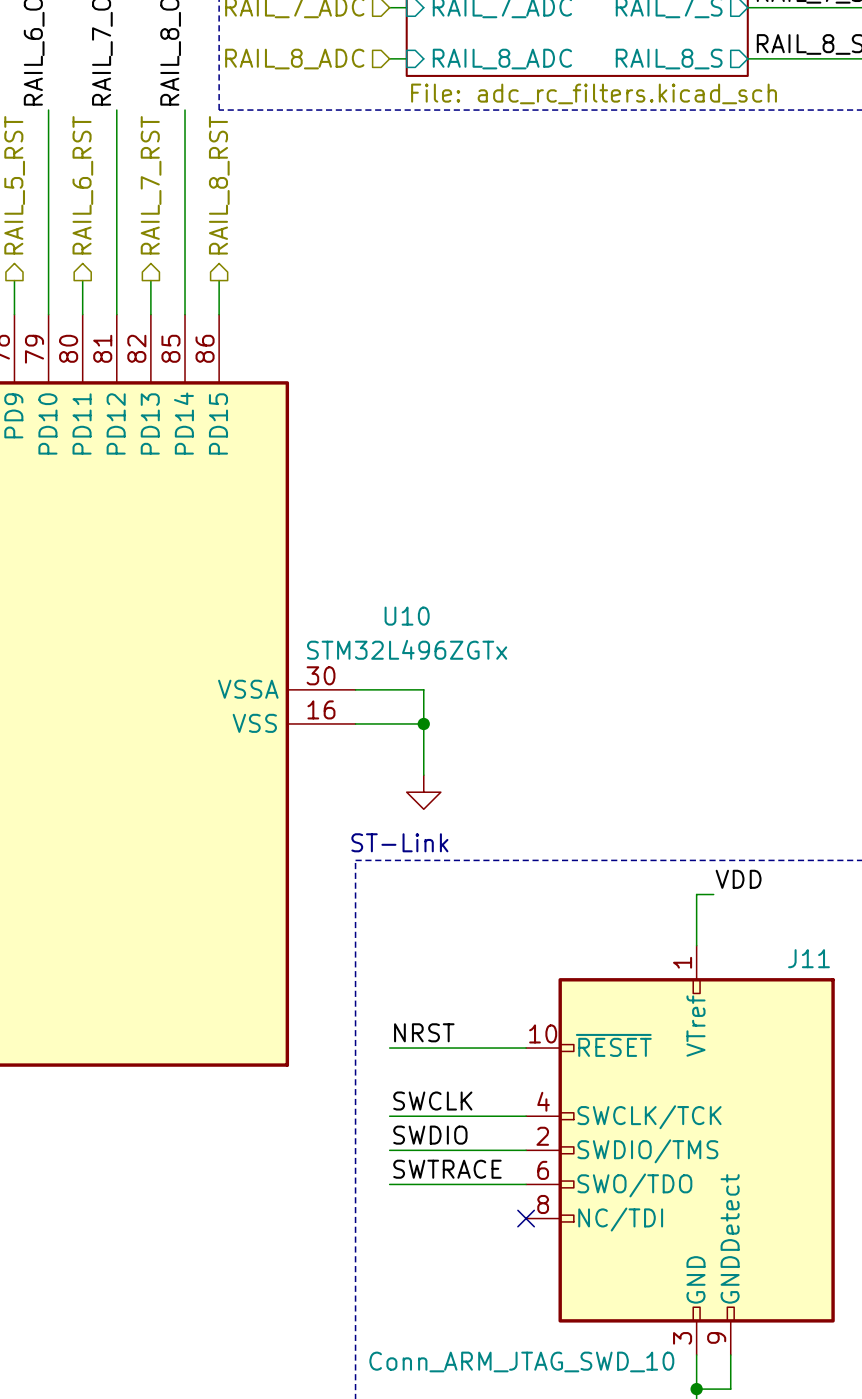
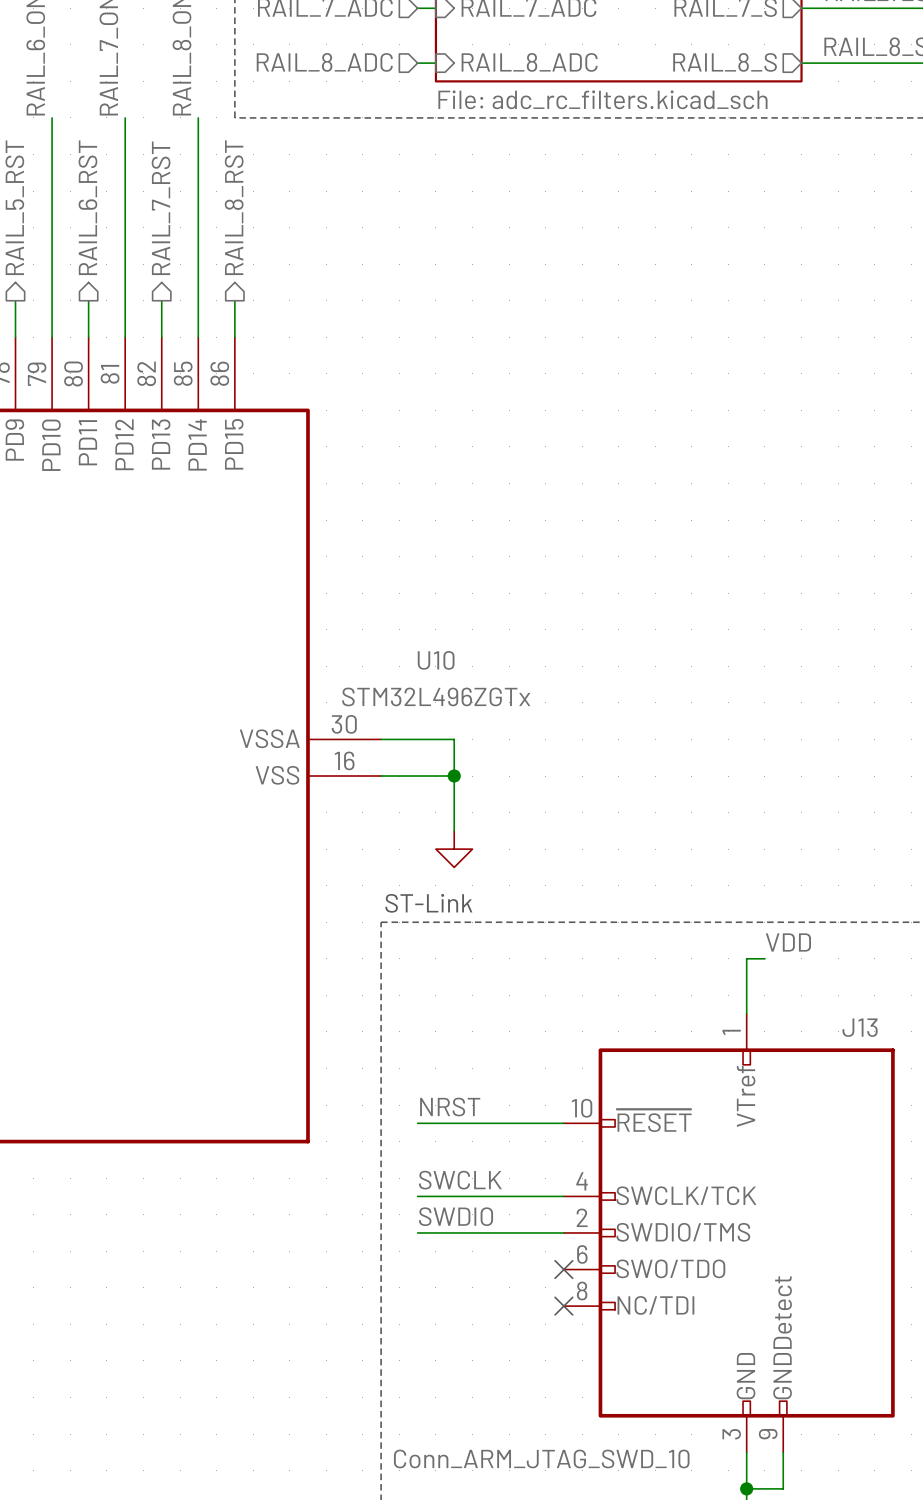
J11 name: J11 (808, 958) -> J13 (860, 1027)
label: SWTRACE (447, 1169) -> none
wire: (389, 1184) (526, 1184) -> none
no-connect mark: none -> (563, 1269)

